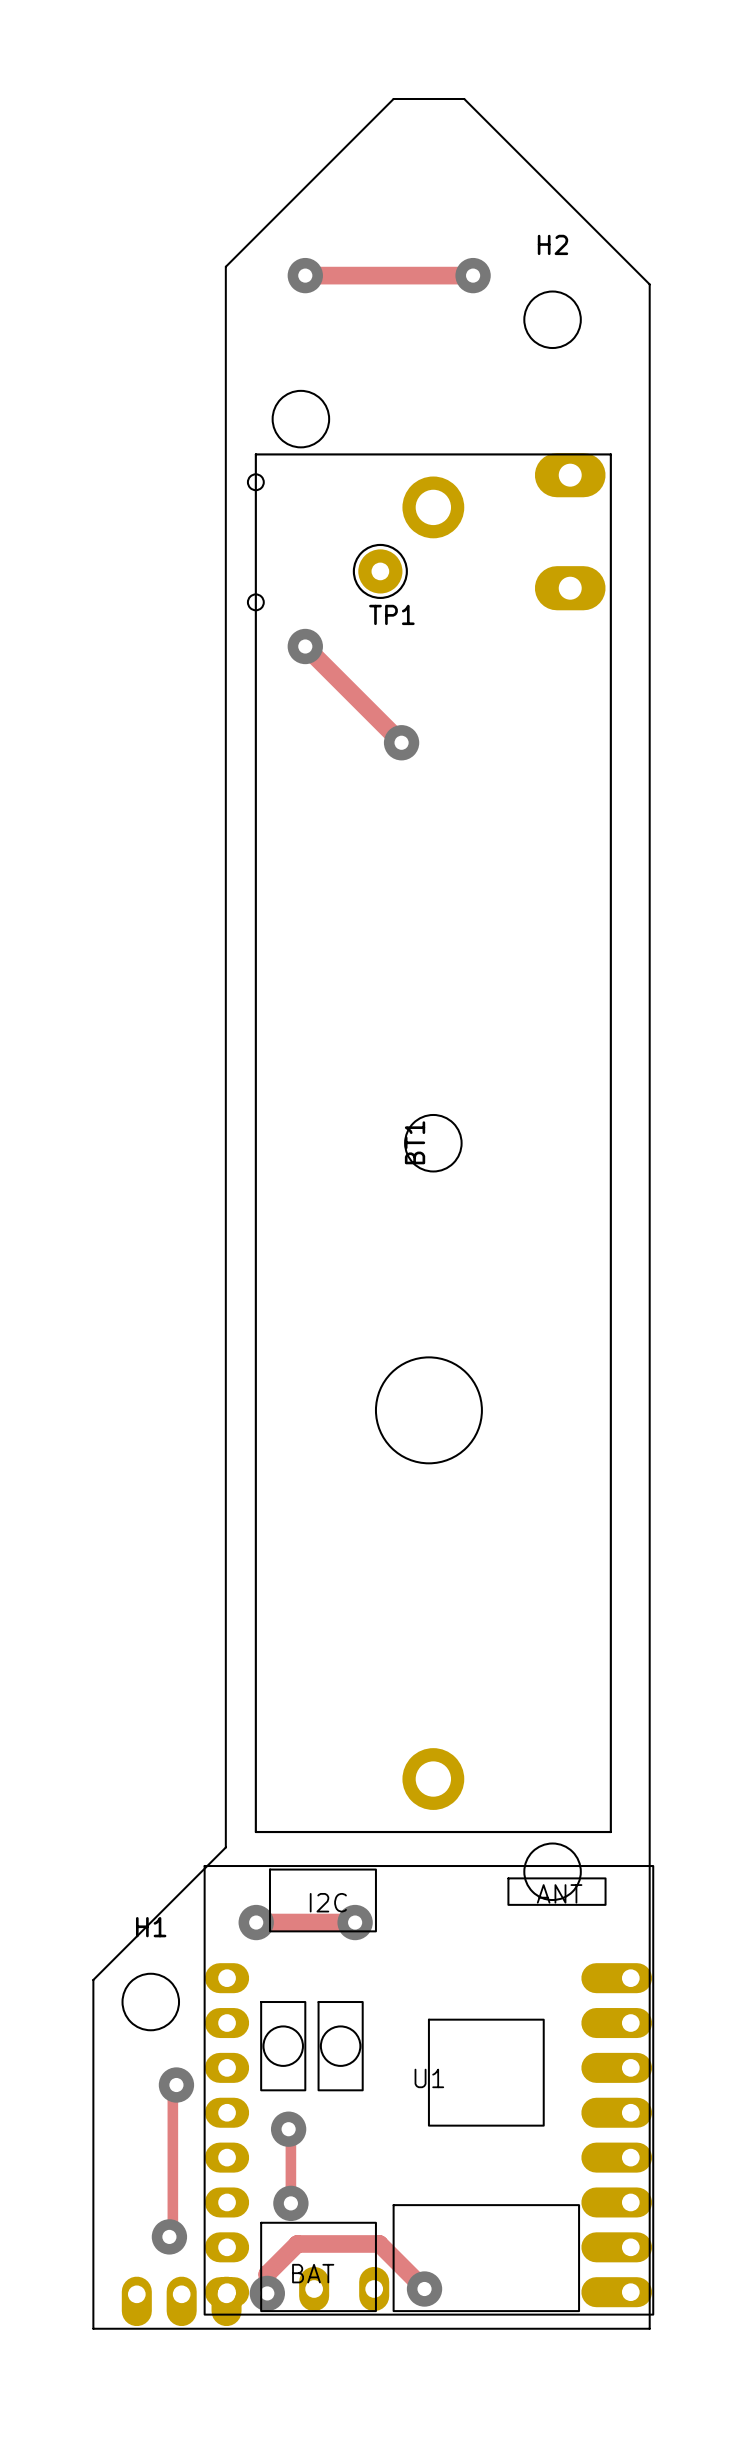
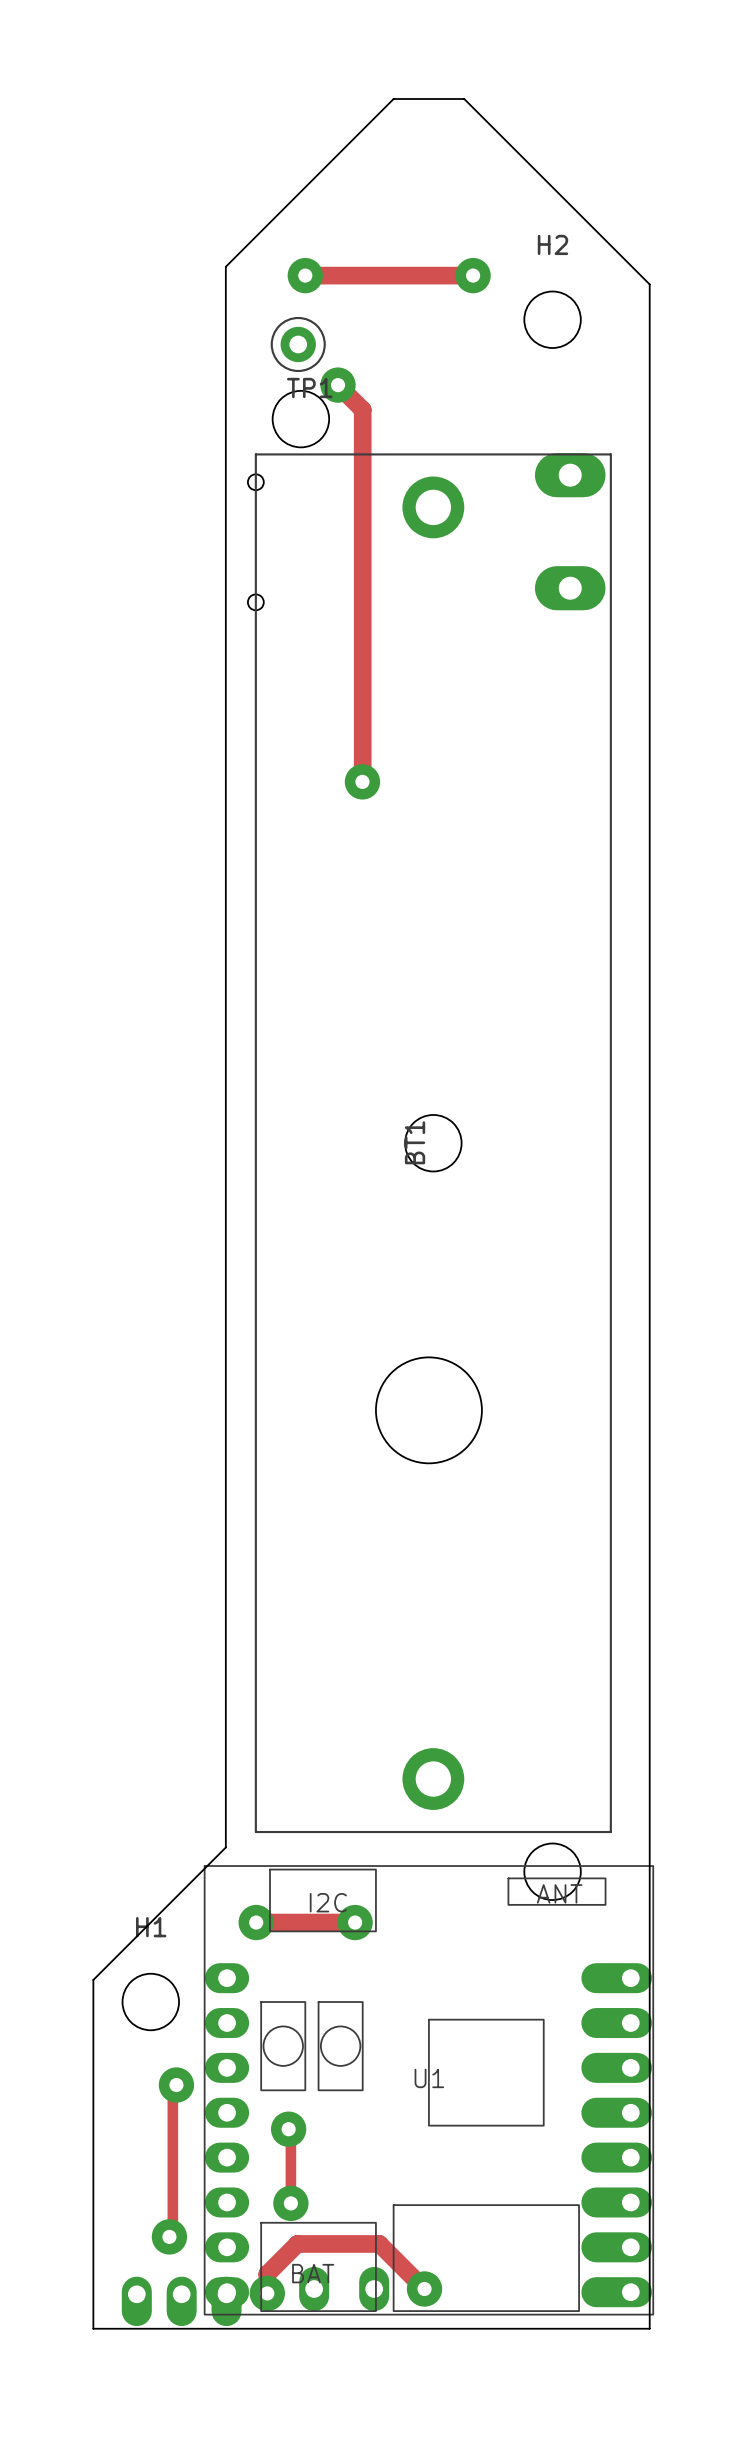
track: none -> (338, 385) (362, 409) (362, 781)
via: none -> (338, 385)
TP1 footprint: [352, 543, 408, 599] -> [270, 316, 326, 373]
track: (305, 646) (401, 742) -> none
via: (305, 646) -> none
via position: (401, 742) -> (362, 781)

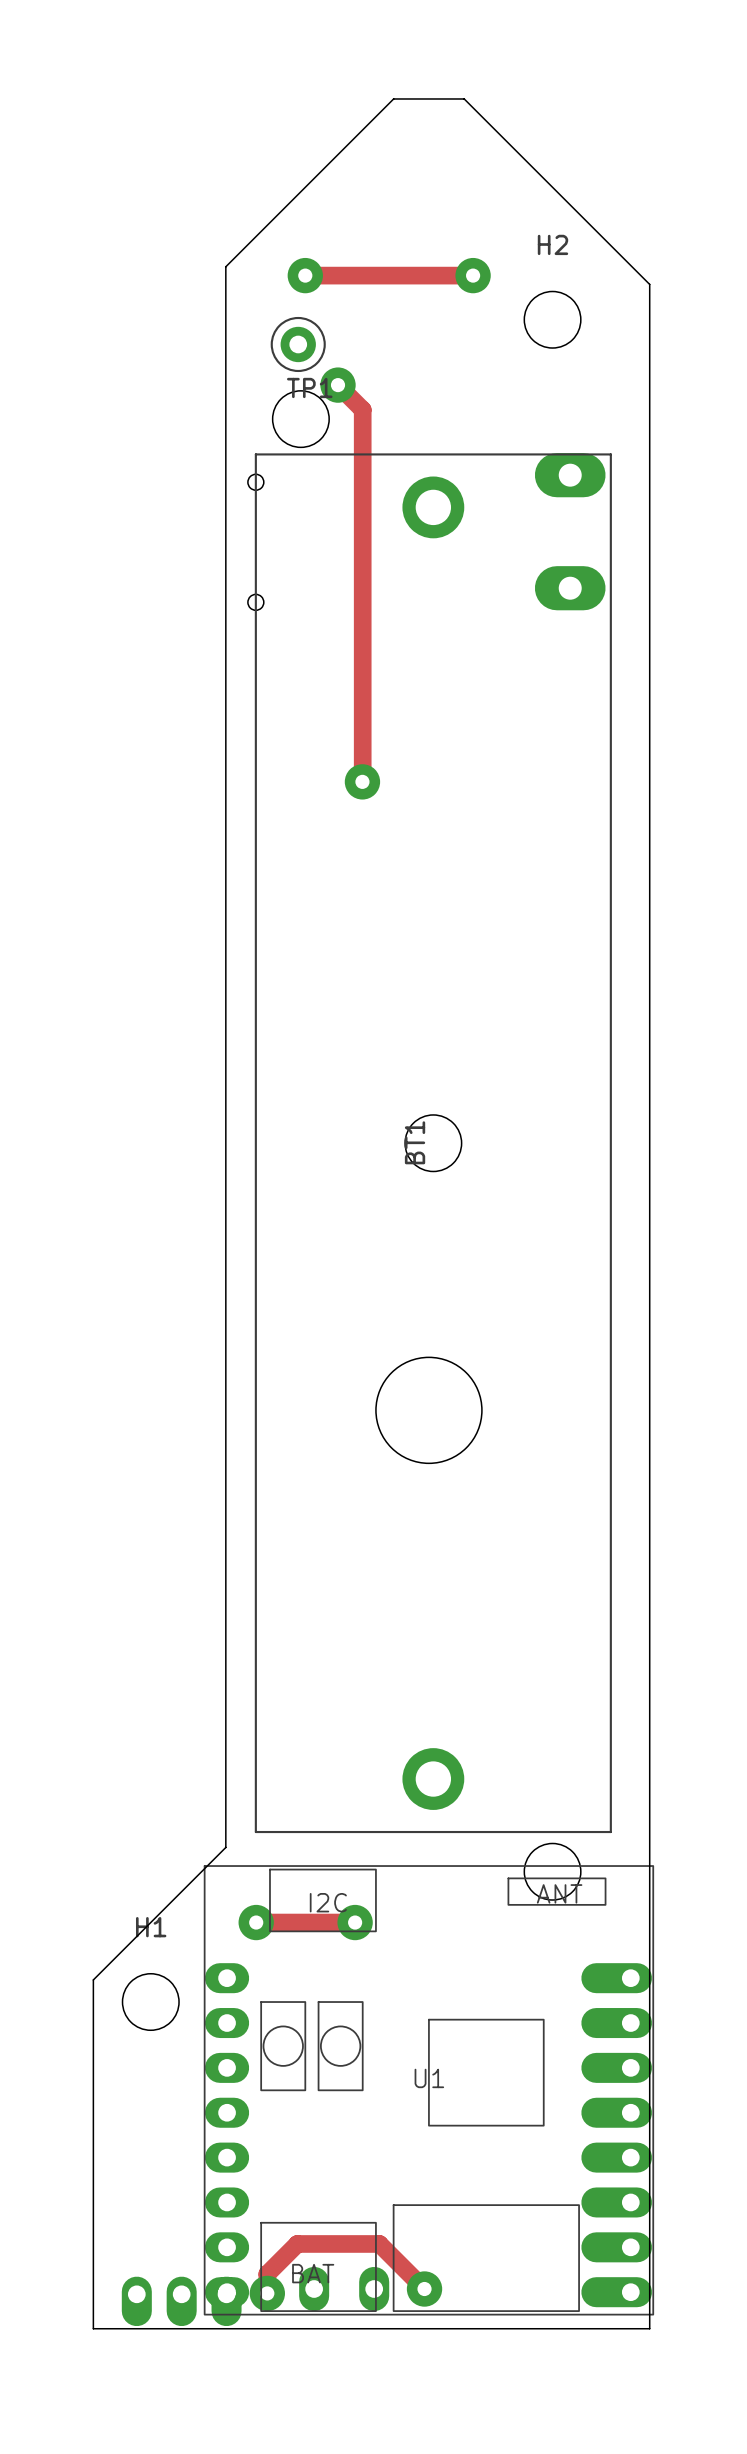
track: (176, 2085) (172, 2088) (172, 2233) (169, 2236) -> none
via: (176, 2085) -> none
track: (288, 2129) (290, 2131) (290, 2203) -> none
via: (288, 2129) -> none
via: (290, 2203) -> none
via: (169, 2236) -> none

